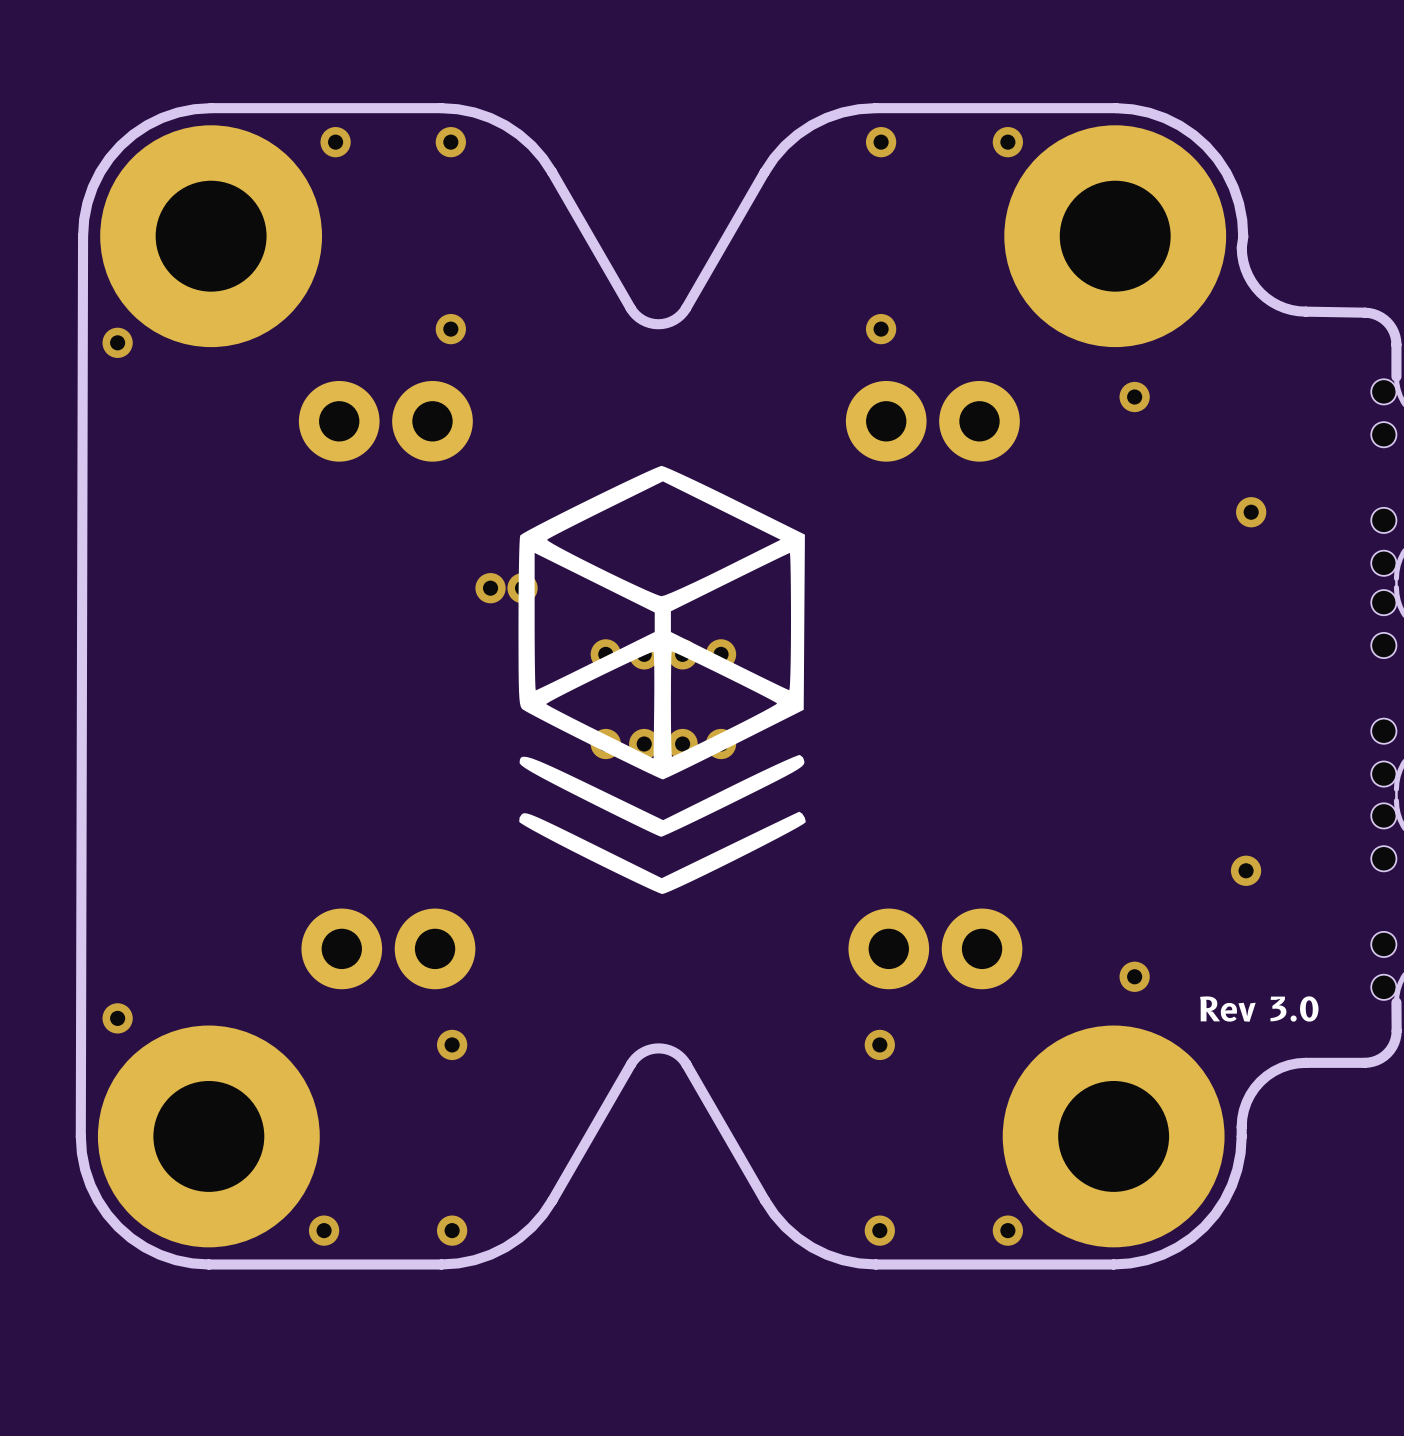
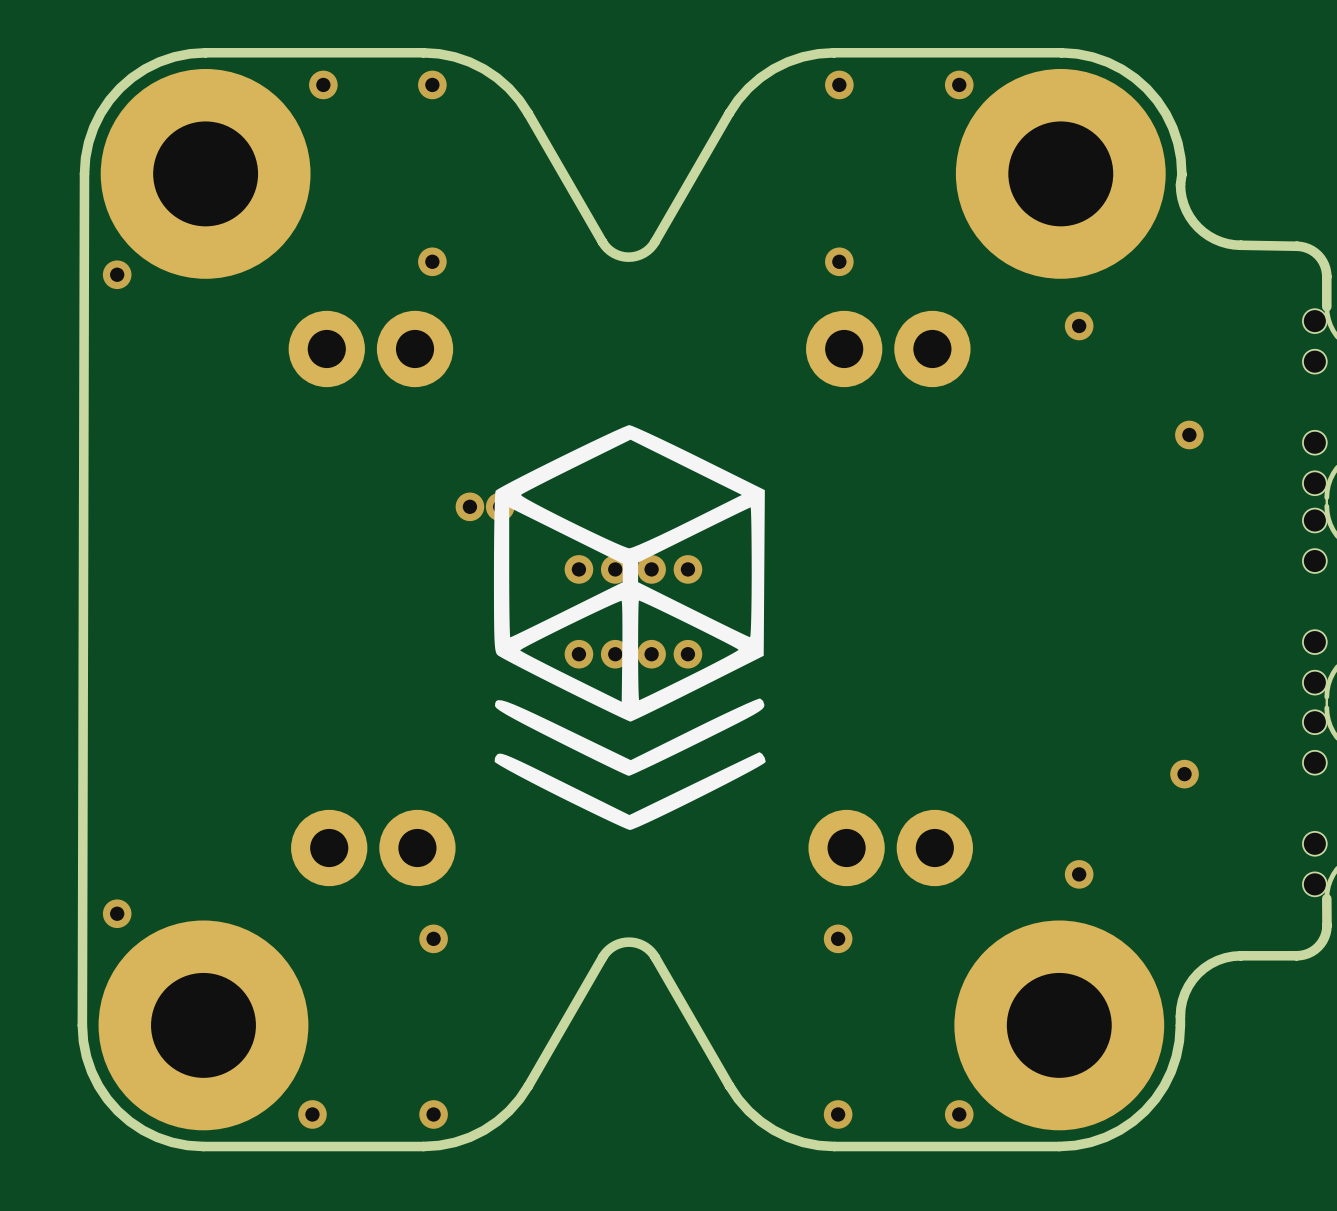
drawing position: (662, 679) -> (629, 627)
text: Rev 3.0 (1259, 1009) -> none

